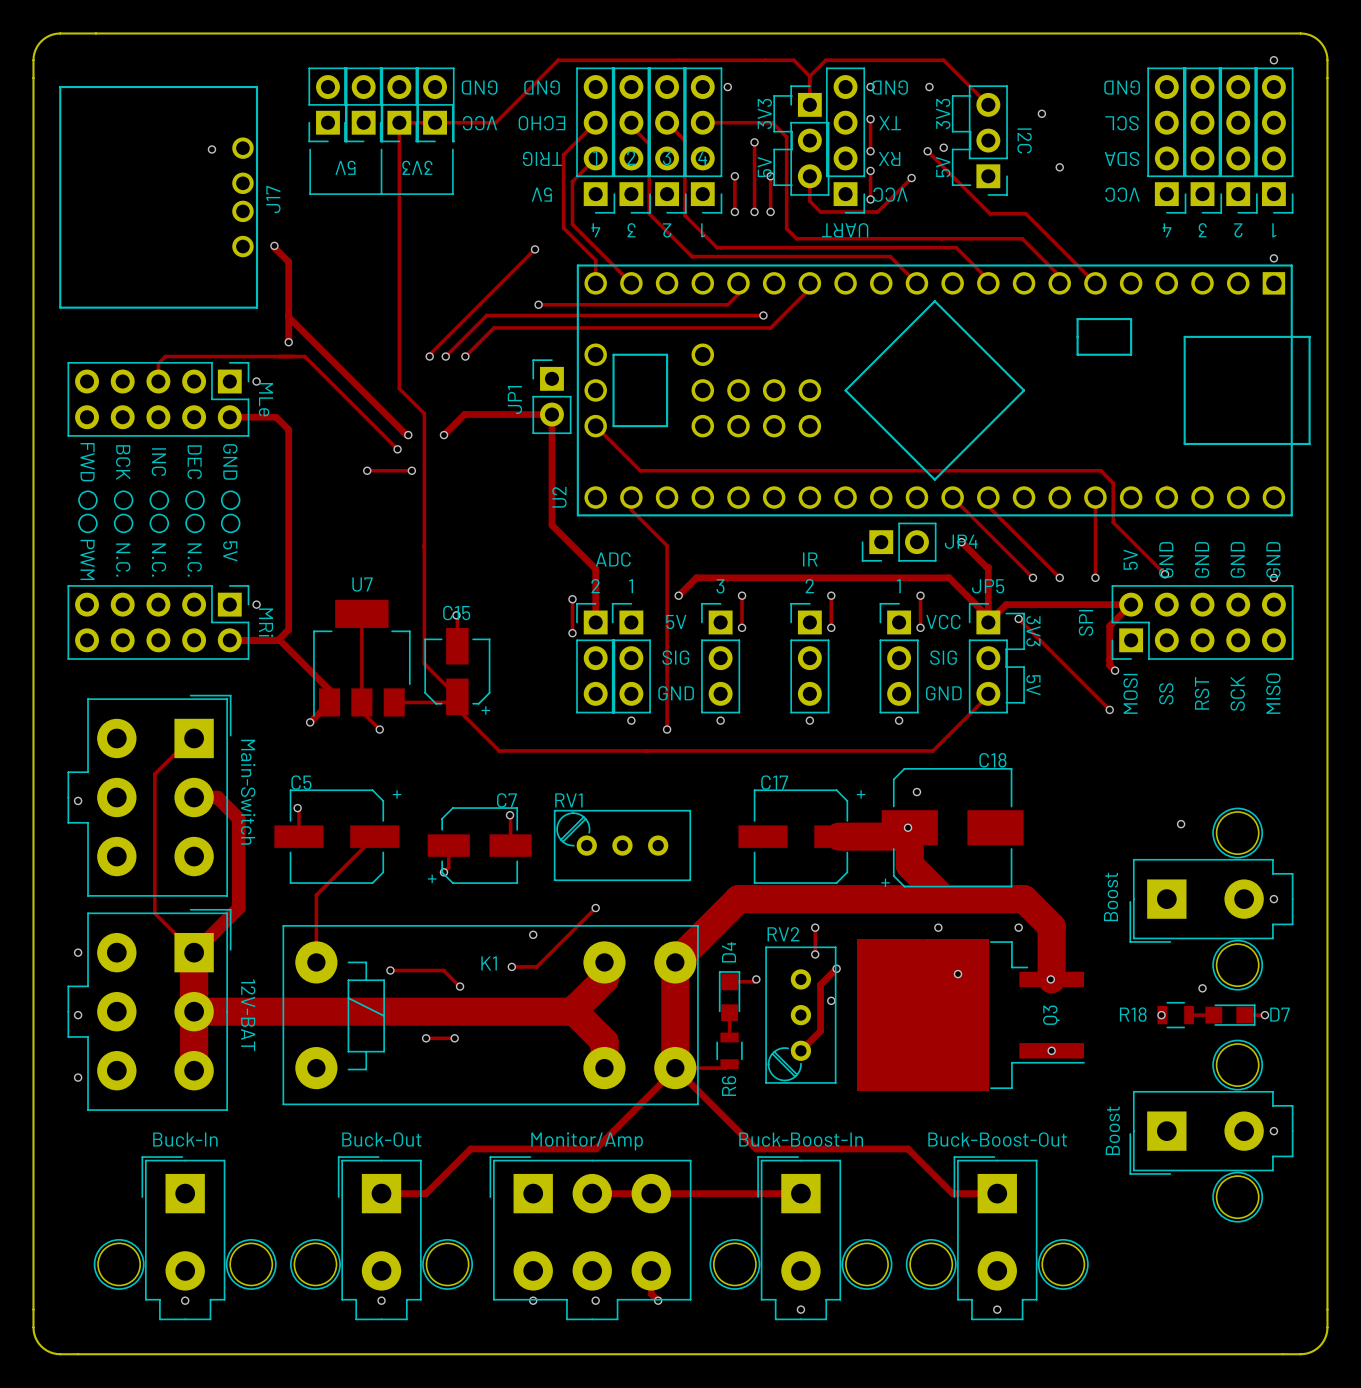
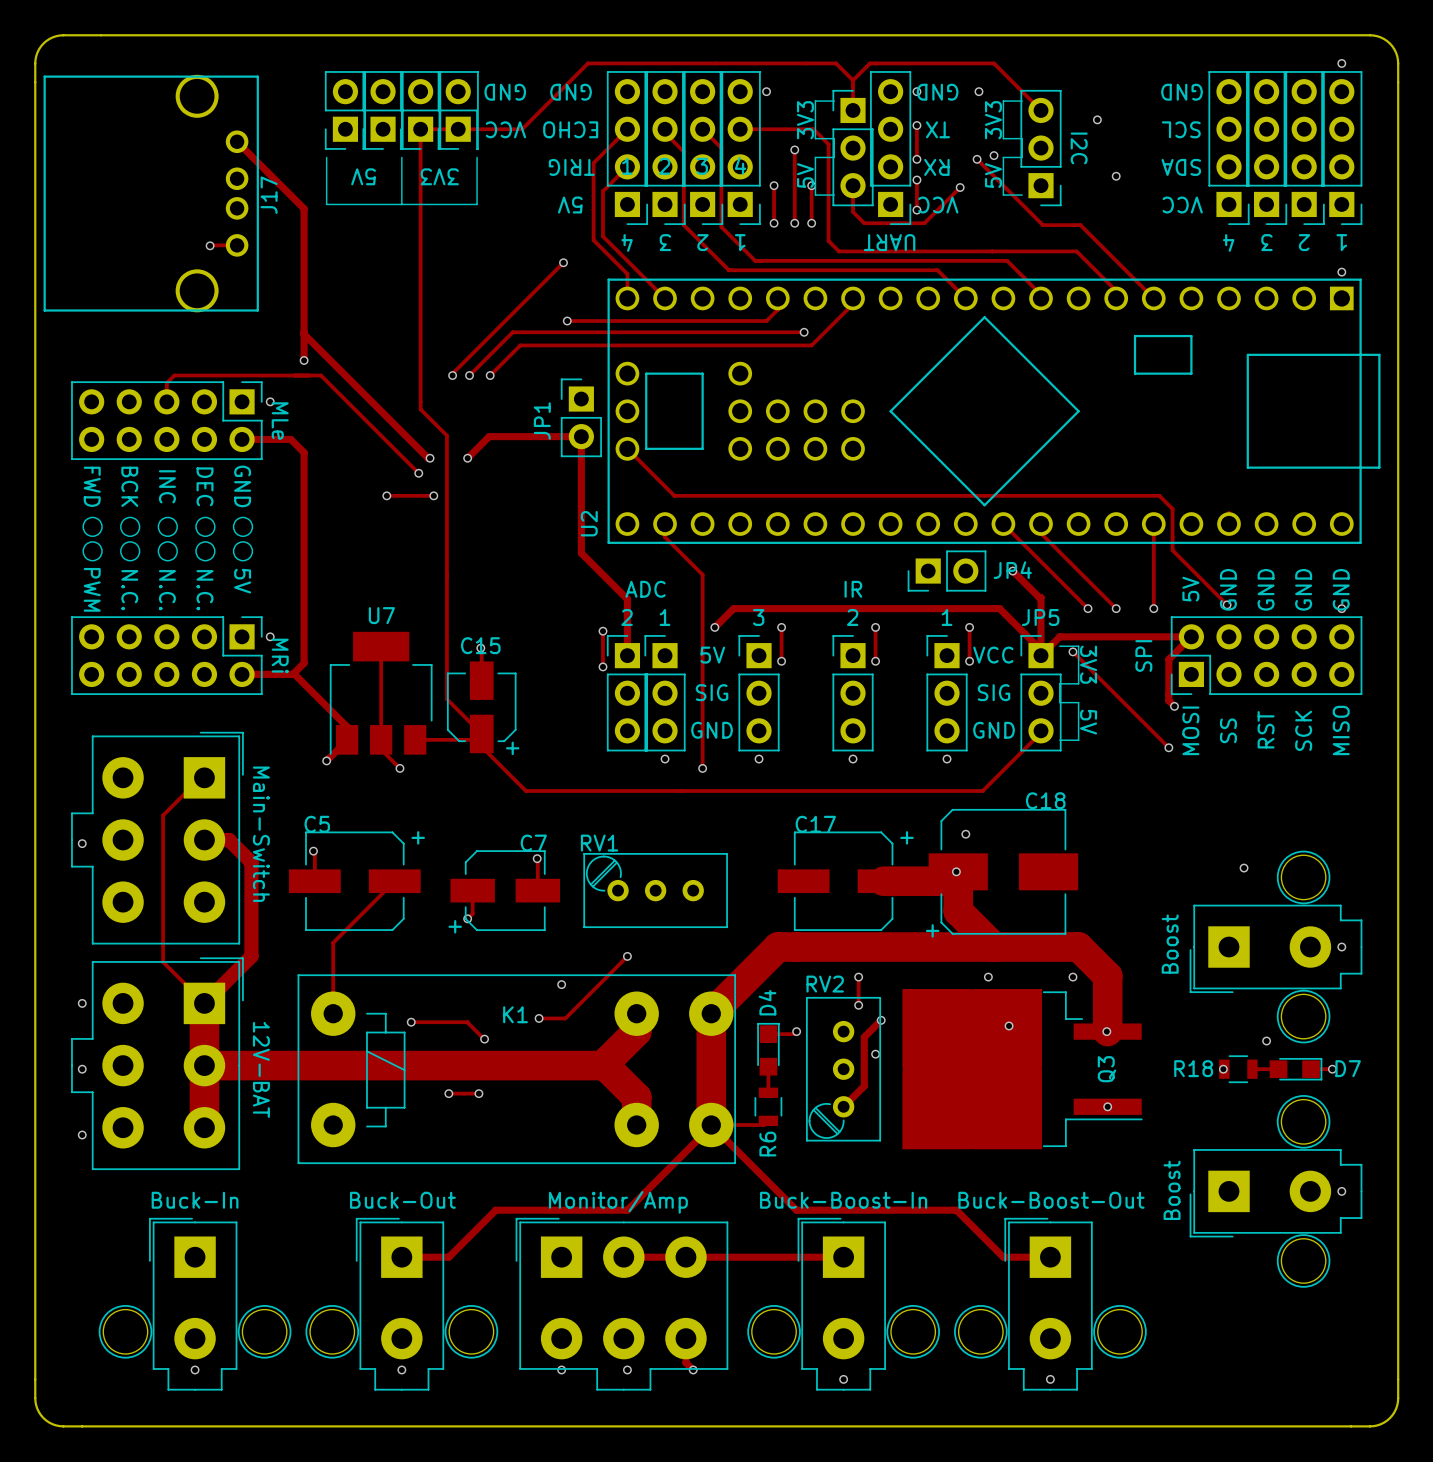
J17 footprint: [59, 80, 259, 315] -> [43, 74, 259, 313]
via: (211, 149) -> none
track: none -> (237, 245) (210, 245)
via: none -> (210, 245)
track: (274, 245) (288, 261) -> (237, 141) (304, 208) (304, 275)
via: (274, 245) -> none

